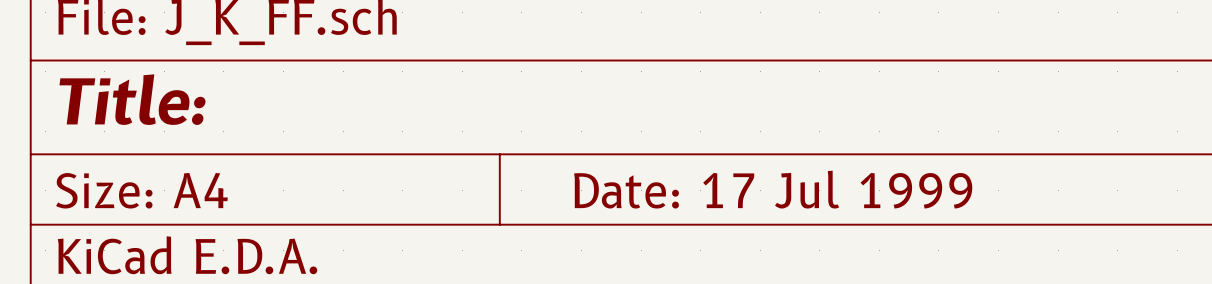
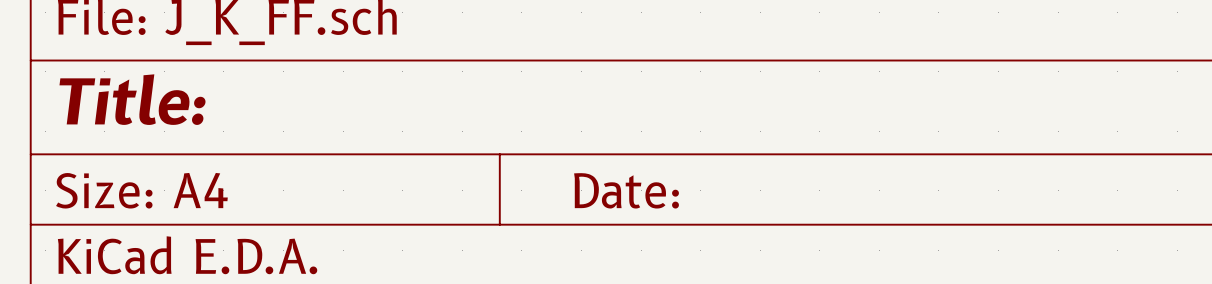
title block: Date: 17 Jul 1999 (773, 189) -> Date: (626, 190)

